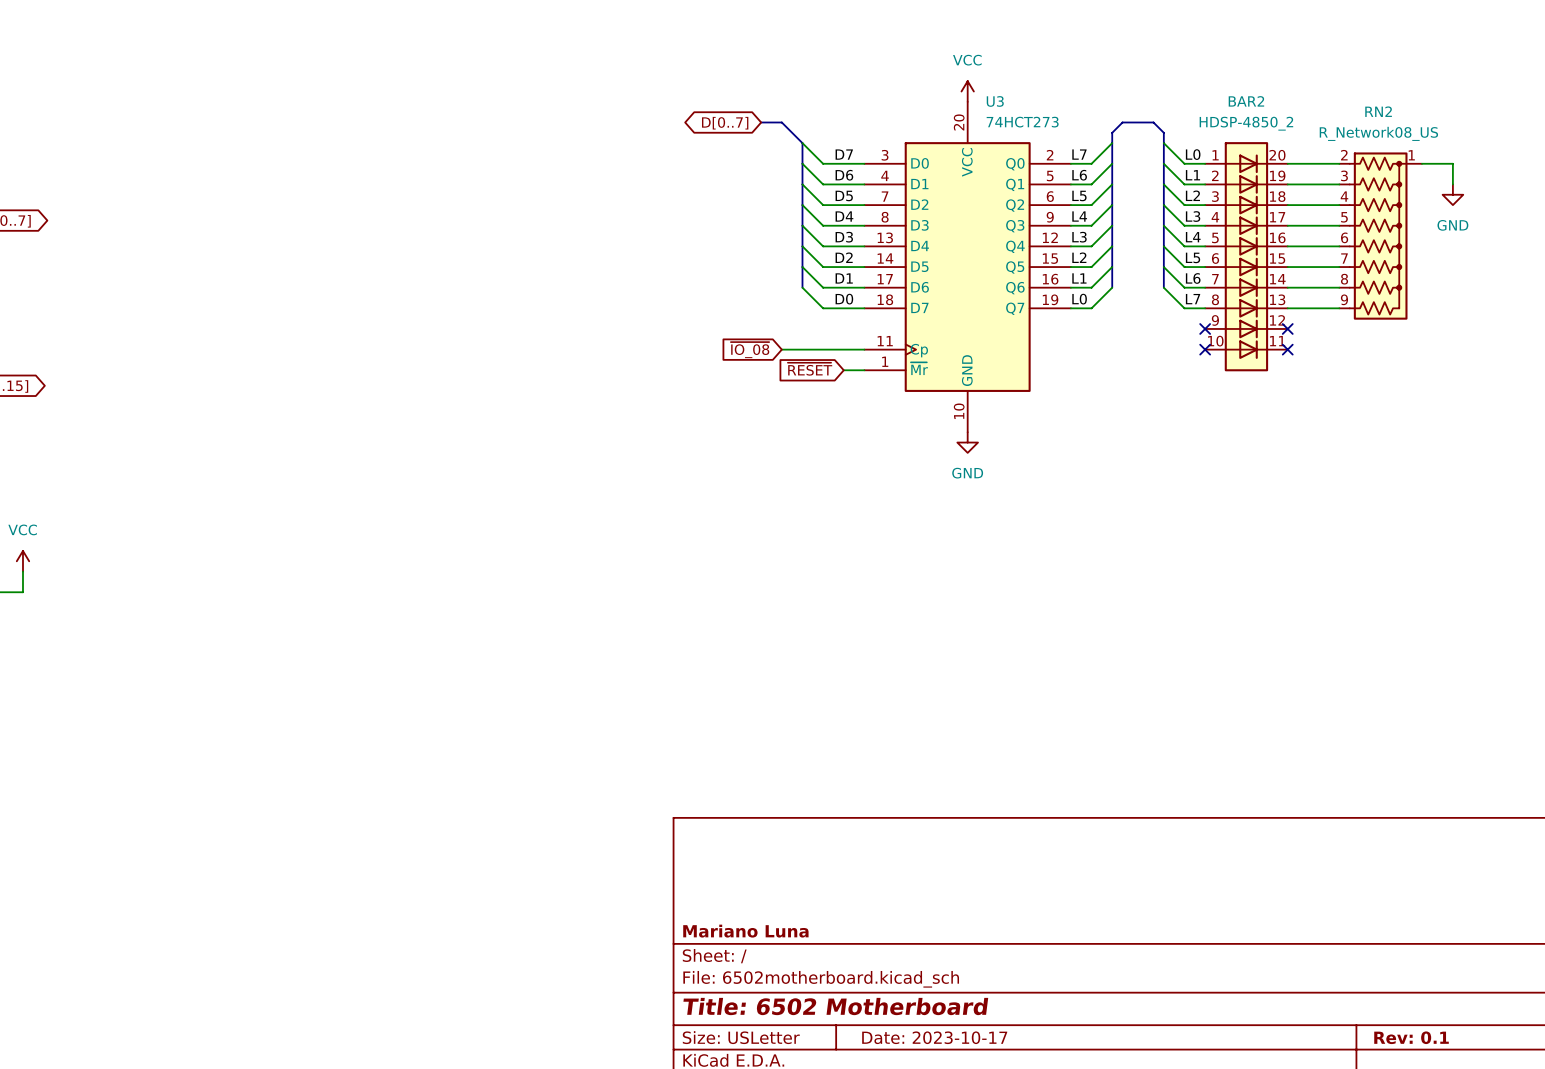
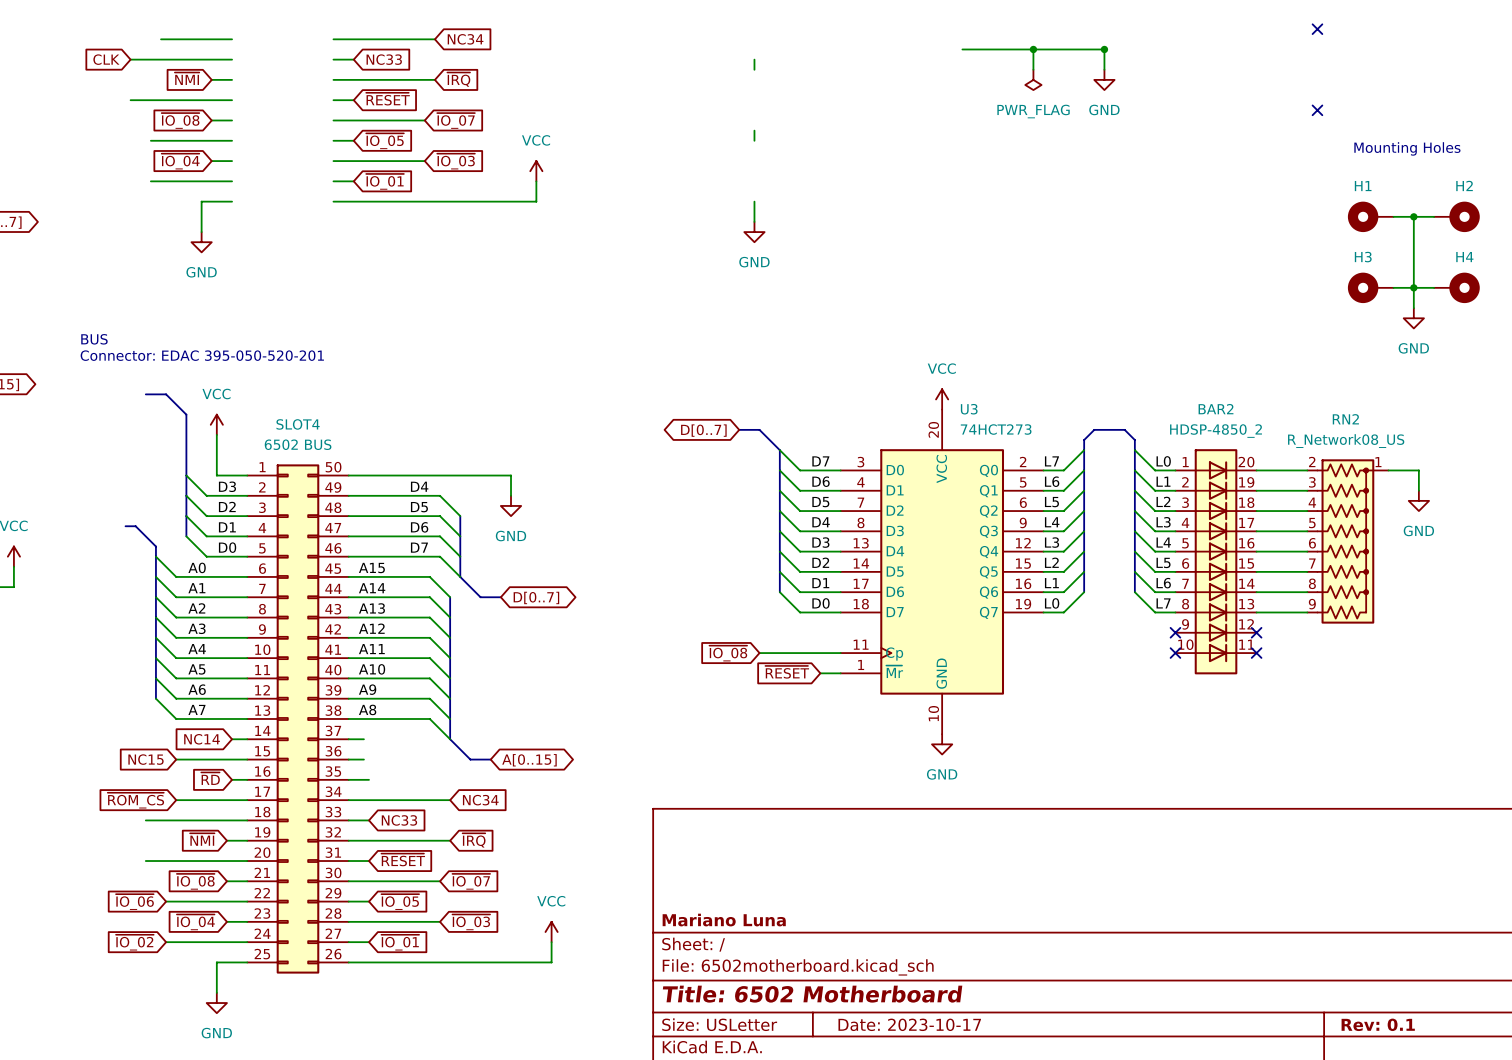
no-connect mark: none -> (1317, 29)
wire: none -> (161, 39) (232, 39)
wire: none -> (333, 39) (434, 39)
global label: none -> NC34 (465, 39)
wire: none -> (962, 49) (1104, 49) (1104, 69)
wire: none -> (1033, 49) (1033, 69)
junction: none -> (1033, 49)
junction: none -> (1104, 49)
global label: none -> CLK (106, 59)
wire: none -> (130, 59) (232, 59)
wire: none -> (333, 59) (353, 59)
global label: none -> NC33 (384, 59)
wire: none -> (754, 59) (754, 69)
global label: none -> ~{NMI} (187, 78)
global label: none -> ~{IRQ} (458, 79)
wire: none -> (211, 79) (232, 79)
wire: none -> (333, 79) (434, 79)
power symbol: none -> PWR_FLAG (1033, 79)
power symbol: none -> GND (1104, 79)
power symbol: VCC (967, 91) -> none
global label: none -> ~{RESET} (388, 99)
wire: none -> (130, 100) (232, 100)
wire: none -> (333, 100) (353, 100)
no-connect mark: none -> (1317, 110)
global label: none -> ~{IO_08} (180, 120)
wire: none -> (211, 120) (232, 120)
wire: none -> (333, 120) (424, 120)
global label: none -> ~{IO_07} (456, 120)
bus: (761, 122) (781, 122) (802, 143) (802, 287) -> none
global label: D[0..7] (725, 123) -> none
wire: none -> (754, 130) (754, 140)
wire: none -> (150, 140) (232, 140)
wire: none -> (333, 140) (353, 140)
global label: none -> ~{IO_05} (385, 141)
wire: (802, 143) (823, 163) (864, 163) -> none
wire: (1112, 143) (1091, 163) (1070, 163) -> none
wire: (1163, 143) (1184, 163) (1205, 163) -> none
text: none -> Mounting Holes (1407, 148)
label: D7 (844, 154) -> none
label: L7 (1079, 154) -> none
label: L0 (1193, 154) -> none
wire: none -> (211, 161) (232, 161)
wire: none -> (333, 161) (424, 161)
global label: none -> ~{IO_04} (180, 161)
global label: none -> ~{IO_03} (456, 161)
wire: (802, 163) (823, 184) (864, 184) -> none
wire: (1112, 163) (1091, 184) (1070, 184) -> none
wire: (1163, 163) (1184, 184) (1205, 184) -> none
wire: (1287, 163) (1339, 163) -> none
wire: (1421, 163) (1452, 163) (1452, 184) -> none
power symbol: none -> VCC (536, 171)
label: D6 (844, 175) -> none
label: L6 (1079, 175) -> none
label: L1 (1192, 175) -> none
wire: none -> (150, 181) (232, 181)
wire: none -> (333, 181) (353, 181)
global label: none -> ~{IO_01} (385, 181)
wire: none -> (536, 181) (536, 201) (333, 201)
wire: (802, 184) (823, 205) (864, 205) -> none
wire: (1112, 184) (1091, 205) (1070, 205) -> none
wire: (1163, 184) (1184, 205) (1205, 205) -> none
wire: (1287, 184) (1339, 184) -> none
power symbol position: GND (1452, 194) -> GND (1413, 318)
label: D5 (844, 195) -> none
label: L5 (1079, 195) -> none
label: L2 (1192, 195) -> none
wire: none -> (232, 201) (201, 201) (201, 232)
wire: none -> (754, 201) (754, 221)
wire: (802, 205) (823, 225) (864, 225) -> none
wire: (1112, 205) (1091, 225) (1070, 225) -> none
wire: (1163, 205) (1184, 225) (1205, 225) -> none
wire: (1287, 205) (1339, 205) -> none
H1: none -> (1370, 216)
wire: none -> (1393, 216) (1434, 216)
wire: none -> (1413, 216) (1413, 308)
junction: none -> (1413, 216)
H2: none -> (1456, 216)
label: D4 (844, 216) -> none
label: L4 (1079, 216) -> none
label: L3 (1193, 216) -> none
wire: (802, 225) (823, 246) (864, 246) -> none
wire: (1112, 225) (1091, 246) (1070, 246) -> none
wire: (1163, 225) (1184, 246) (1205, 246) -> none
wire: (1287, 225) (1339, 225) -> none
power symbol: none -> GND (754, 232)
RN2 position: (1380, 236) -> (1347, 541)
label: D3 (844, 237) -> none
label: L3 (1079, 237) -> none
label: L4 (1193, 237) -> none
power symbol: none -> GND (201, 242)
wire: (802, 246) (823, 267) (864, 267) -> none
wire: (1112, 246) (1091, 267) (1070, 267) -> none
wire: (1163, 246) (1184, 267) (1205, 267) -> none
wire: (1287, 246) (1339, 246) -> none
BAR2 position: (1246, 256) -> (1216, 561)
label: D2 (844, 257) -> none
label: L2 (1079, 257) -> none
label: L5 (1193, 257) -> none
wire: (802, 267) (823, 287) (864, 287) -> (779, 450) (800, 470) (840, 470)
U3 position: (967, 267) -> (942, 571)
wire: (1112, 267) (1091, 287) (1070, 287) -> (1084, 450) (1063, 470) (1043, 470)
wire: (1163, 267) (1184, 287) (1205, 287) -> (1134, 450) (1155, 470) (1175, 470)
wire: (1287, 267) (1339, 267) -> none
label: D1 (844, 278) -> none
label: L1 (1079, 278) -> none
label: L6 (1193, 278) -> none
wire: (802, 287) (823, 308) (864, 308) -> (779, 470) (800, 490) (840, 490)
wire: (1112, 287) (1091, 308) (1070, 308) -> (1084, 470) (1063, 490) (1043, 490)
bus: (1112, 287) (1112, 132) (1122, 122) (1153, 122) (1163, 132) (1163, 287) -> none
wire: (1163, 287) (1184, 308) (1205, 308) -> (1134, 470) (1155, 490) (1175, 490)
wire: (1287, 287) (1339, 287) -> (1256, 470) (1307, 470)
H3: none -> (1370, 287)
wire: none -> (1393, 287) (1434, 287)
junction: none -> (1413, 287)
H4: none -> (1456, 287)
label: D0 (844, 299) -> none
label: L0 (1079, 299) -> none
label: L7 (1193, 299) -> none
wire: (1287, 308) (1339, 308) -> (1256, 490) (1307, 490)
no-connect mark: (1205, 328) -> none
no-connect mark: (1287, 328) -> none
text: none -> BUS (94, 339)
wire: (781, 349) (864, 349) -> none
no-connect mark: (1205, 349) -> none
no-connect mark: (1287, 349) -> none
global label: ~{IO_08} (750, 350) -> none
text: none -> Connector: EDAC 395-050-520-201 (202, 355)
global label: ~{RESET} (810, 369) -> none
wire: (843, 370) (864, 370) -> none
bus: none -> (145, 394) (166, 394) (186, 414) (186, 536)
power symbol: none -> VCC (942, 399)
power symbol: none -> VCC (216, 424)
global label: none -> D[0..7] (703, 430)
bus: none -> (739, 429) (759, 429) (779, 450) (779, 592)
wire: none -> (216, 434) (216, 475) (247, 475)
power symbol: GND (967, 442) -> none
label: none -> D7 (820, 461)
label: none -> L7 (1051, 461)
label: none -> L0 (1163, 461)
wire: none -> (1388, 470) (1418, 470) (1418, 490)
wire: none -> (186, 475) (206, 495) (247, 495)
wire: none -> (348, 475) (511, 475) (511, 495)
label: none -> D6 (821, 481)
label: none -> L6 (1052, 481)
label: none -> L1 (1163, 481)
label: none -> D3 (227, 486)
label: none -> D4 (419, 486)
wire: none -> (779, 490) (800, 511) (840, 511)
wire: none -> (1084, 490) (1063, 511) (1043, 511)
wire: none -> (1134, 490) (1155, 511) (1175, 511)
wire: none -> (186, 495) (206, 516) (247, 516)
wire: none -> (348, 495) (440, 495) (460, 516)
power symbol: none -> GND (1418, 500)
label: none -> D5 (820, 502)
label: none -> L5 (1051, 502)
label: none -> L2 (1163, 501)
power symbol: none -> GND (511, 505)
label: none -> D2 (227, 506)
label: none -> D5 (419, 507)
wire: none -> (779, 511) (800, 531) (840, 531)
wire: none -> (1084, 511) (1063, 531) (1043, 531)
wire: none -> (1134, 511) (1155, 531) (1175, 531)
wire: none -> (1256, 511) (1307, 511)
wire: none -> (186, 516) (206, 536) (247, 536)
wire: none -> (348, 516) (440, 516) (460, 536)
bus: none -> (460, 516) (460, 576) (480, 597) (500, 597)
label: none -> D4 (821, 522)
label: none -> L4 (1052, 522)
label: none -> L3 (1163, 522)
bus: none -> (125, 526) (135, 526) (155, 546) (155, 698)
label: none -> D1 (227, 527)
label: none -> D6 (419, 527)
wire: none -> (779, 531) (800, 551) (840, 551)
wire: none -> (1084, 531) (1063, 551) (1043, 551)
wire: none -> (1134, 531) (1155, 551) (1175, 551)
wire: none -> (1256, 531) (1307, 531)
wire: none -> (186, 536) (206, 556) (247, 556)
wire: none -> (348, 536) (440, 536) (460, 556)
label: none -> D3 (820, 542)
label: none -> L3 (1052, 542)
label: none -> L4 (1163, 542)
label: none -> D0 (227, 547)
label: none -> D7 (419, 547)
wire: none -> (779, 551) (800, 571) (840, 571)
wire: none -> (1084, 551) (1063, 571) (1043, 571)
wire: none -> (1134, 551) (1155, 571) (1175, 571)
wire: none -> (1256, 551) (1307, 551)
wire: none -> (155, 556) (176, 576) (247, 576)
wire: none -> (348, 556) (440, 556) (460, 576)
label: none -> D2 (820, 562)
label: none -> L2 (1051, 562)
label: none -> L5 (1163, 562)
label: none -> A0 (197, 567)
label: none -> A15 (371, 568)
wire: none -> (779, 571) (800, 592) (840, 592)
wire: none -> (1084, 571) (1063, 592) (1043, 592)
wire: none -> (1134, 571) (1155, 592) (1175, 592)
wire: none -> (1256, 571) (1307, 571)
wire: none -> (155, 576) (176, 597) (247, 597)
wire: none -> (348, 576) (429, 576) (450, 597)
label: none -> D1 (820, 583)
label: none -> L1 (1051, 583)
label: none -> L6 (1163, 583)
label: none -> A1 (196, 588)
label: none -> A14 (372, 588)
wire: none -> (779, 592) (800, 612) (840, 612)
wire: none -> (1084, 592) (1063, 612) (1043, 612)
bus: none -> (1084, 592) (1084, 440) (1094, 429) (1124, 429) (1134, 440) (1134, 592)
wire: none -> (1134, 592) (1155, 612) (1175, 612)
wire: none -> (1256, 592) (1307, 592)
wire: none -> (155, 597) (176, 617) (247, 617)
wire: none -> (348, 597) (429, 597) (450, 617)
bus: none -> (450, 597) (450, 739) (470, 759) (490, 759)
global label: none -> D[0..7] (536, 597)
label: none -> D0 (820, 603)
label: none -> L0 (1052, 603)
label: none -> L7 (1163, 603)
label: none -> A2 (196, 608)
label: none -> A13 (371, 608)
wire: none -> (1256, 612) (1307, 612)
wire: none -> (155, 617) (176, 637) (247, 637)
wire: none -> (348, 617) (429, 617) (450, 637)
label: none -> A3 (196, 628)
label: none -> A12 (371, 628)
no-connect mark: none -> (1175, 632)
no-connect mark: none -> (1256, 632)
wire: none -> (155, 637) (176, 658) (247, 658)
wire: none -> (348, 637) (429, 637) (450, 658)
label: none -> A4 (197, 649)
label: none -> A11 (371, 649)
global label: none -> ~{IO_08} (728, 653)
wire: none -> (759, 653) (840, 653)
no-connect mark: none -> (1175, 653)
no-connect mark: none -> (1256, 653)
wire: none -> (155, 658) (176, 678) (247, 678)
wire: none -> (348, 658) (429, 658) (450, 678)
label: none -> A10 (372, 669)
label: none -> A5 (196, 669)
global label: none -> ~{RESET} (787, 672)
wire: none -> (820, 673) (840, 673)
wire: none -> (155, 678) (176, 698) (247, 698)
wire: none -> (348, 678) (429, 678) (450, 698)
label: none -> A6 (197, 689)
label: none -> A9 (367, 689)
wire: none -> (155, 698) (176, 718) (247, 718)
wire: none -> (348, 698) (429, 698) (450, 718)
label: none -> A7 (196, 709)
label: none -> A8 (367, 709)
SLOT4: none -> 6502 BUS (297, 718)
wire: none -> (348, 718) (429, 718) (450, 739)
global label: none -> NC14 (202, 739)
wire: none -> (232, 739) (247, 739)
wire: none -> (348, 739) (363, 739)
power symbol: none -> GND (942, 744)
global label: none -> NC15 (146, 759)
wire: none -> (176, 759) (247, 759)
wire: none -> (348, 759) (363, 759)
global label: none -> A[0..15] (529, 760)
global label: none -> ~{RD} (210, 778)
wire: none -> (232, 779) (247, 779)
wire: none -> (348, 779) (368, 779)
global label: none -> ~{ROM_CS} (135, 800)
wire: none -> (176, 800) (247, 800)
wire: none -> (348, 800) (450, 800)
global label: none -> NC34 (480, 800)
wire: none -> (145, 820) (247, 820)
wire: none -> (348, 820) (368, 820)
global label: none -> NC33 (399, 820)
global label: none -> ~{NMI} (202, 839)
wire: none -> (226, 840) (247, 840)
wire: none -> (348, 840) (450, 840)
global label: none -> ~{IRQ} (474, 840)
global label: none -> ~{RESET} (403, 859)
wire: none -> (145, 861) (247, 861)
wire: none -> (348, 861) (368, 861)
wire: none -> (226, 881) (247, 881)
wire: none -> (348, 881) (440, 881)
global label: none -> ~{IO_08} (195, 881)
global label: none -> ~{IO_07} (471, 881)
global label: none -> ~{IO_06} (134, 902)
wire: none -> (166, 901) (247, 901)
wire: none -> (348, 901) (368, 901)
global label: none -> ~{IO_05} (400, 902)
wire: none -> (226, 921) (247, 921)
wire: none -> (348, 921) (440, 921)
global label: none -> ~{IO_04} (195, 922)
global label: none -> ~{IO_03} (471, 922)
power symbol: none -> VCC (551, 932)
wire: none -> (166, 942) (247, 942)
wire: none -> (348, 942) (368, 942)
wire: none -> (551, 942) (551, 962) (348, 962)
global label: none -> ~{IO_02} (134, 942)
global label: none -> ~{IO_01} (400, 942)
wire: none -> (247, 962) (216, 962) (216, 992)
power symbol: none -> GND (216, 1003)

